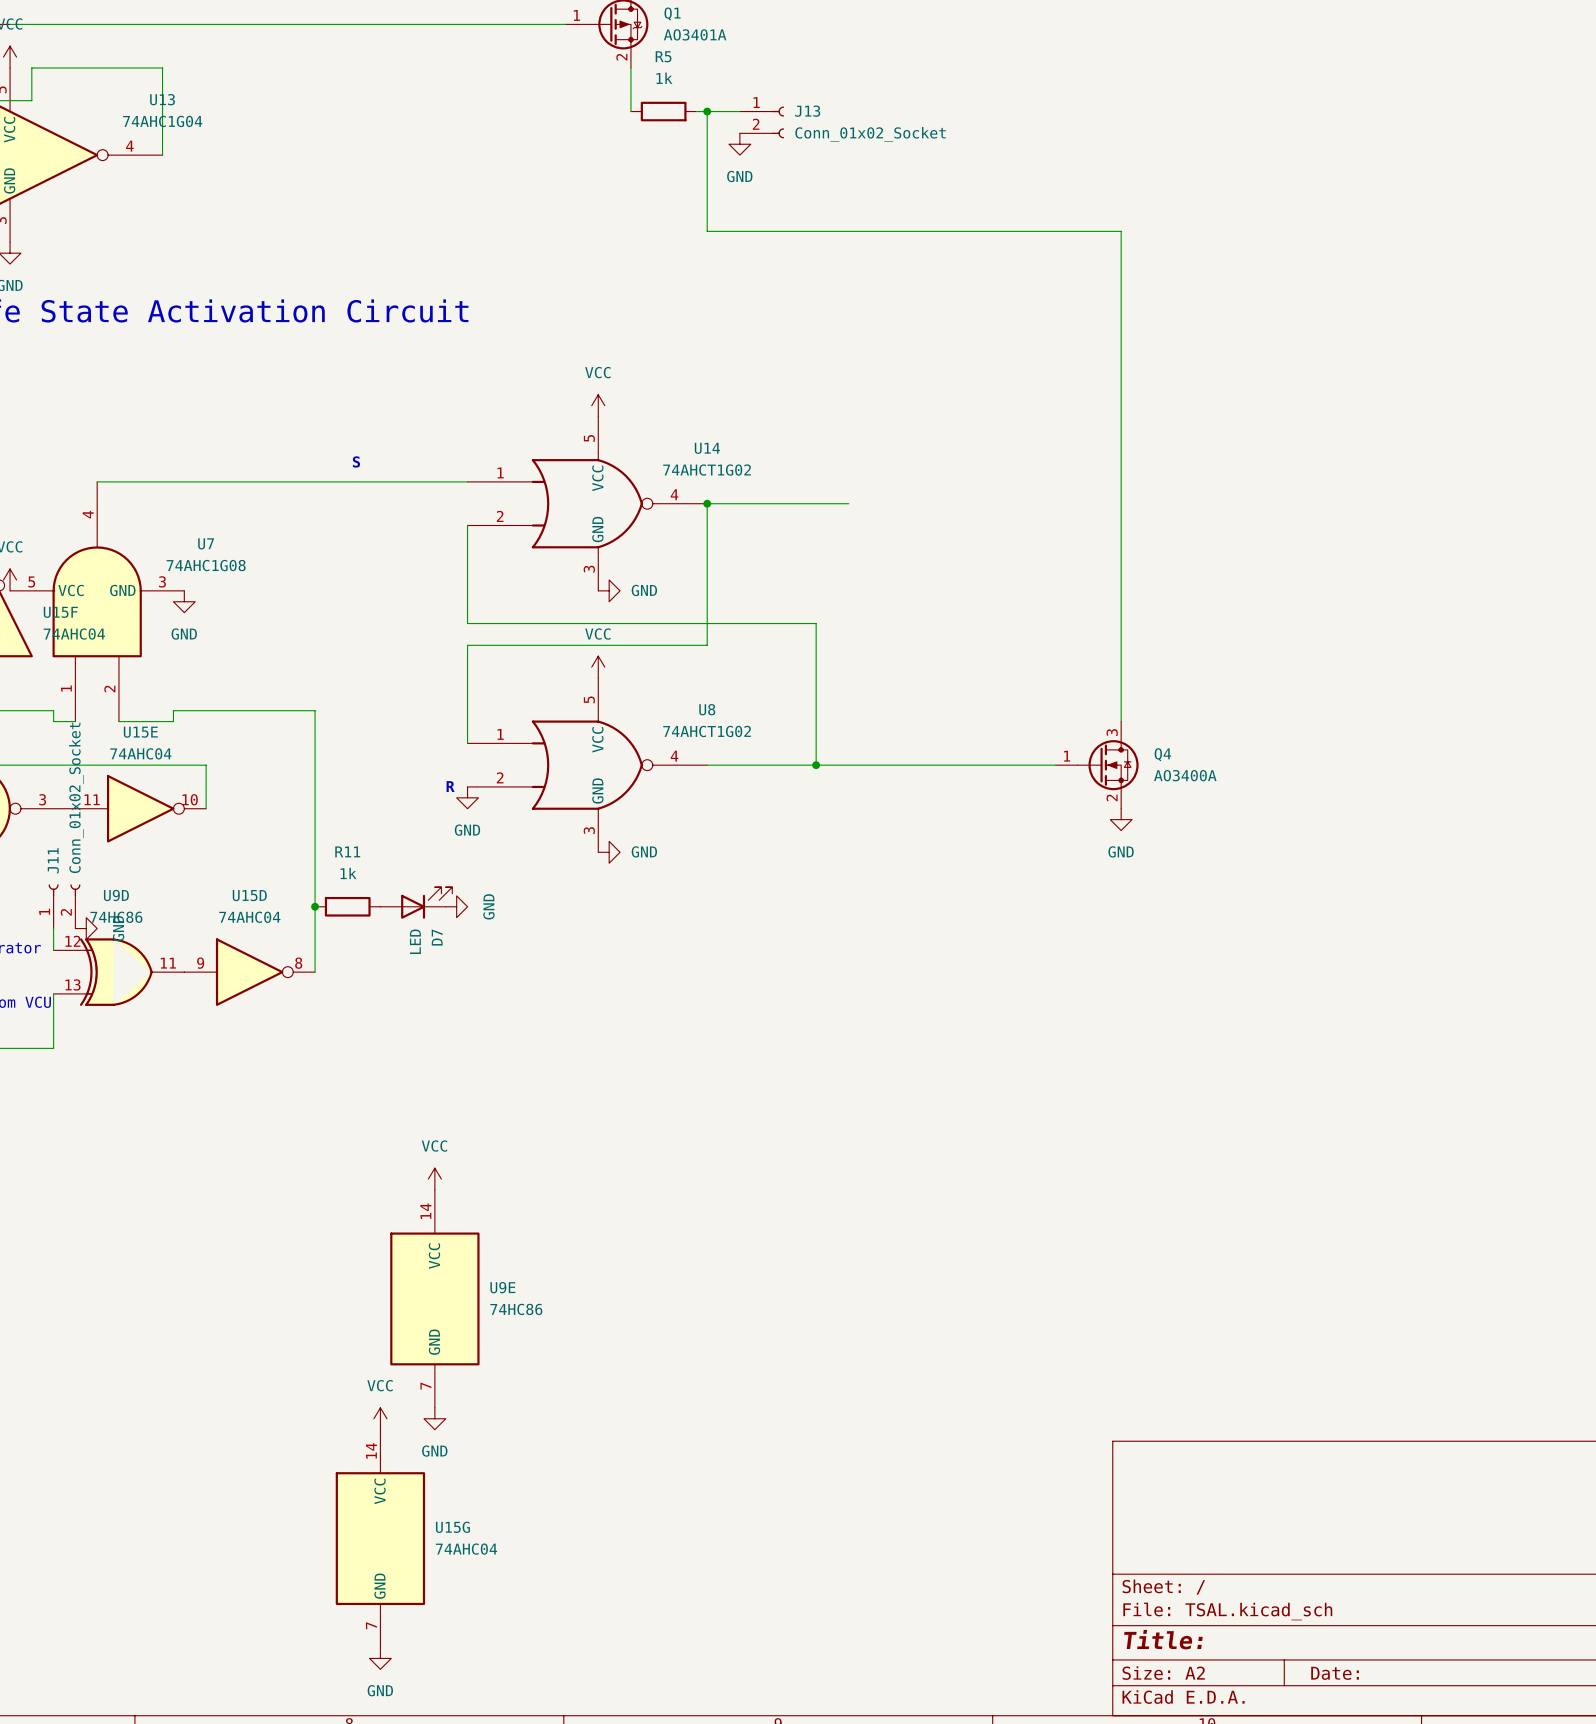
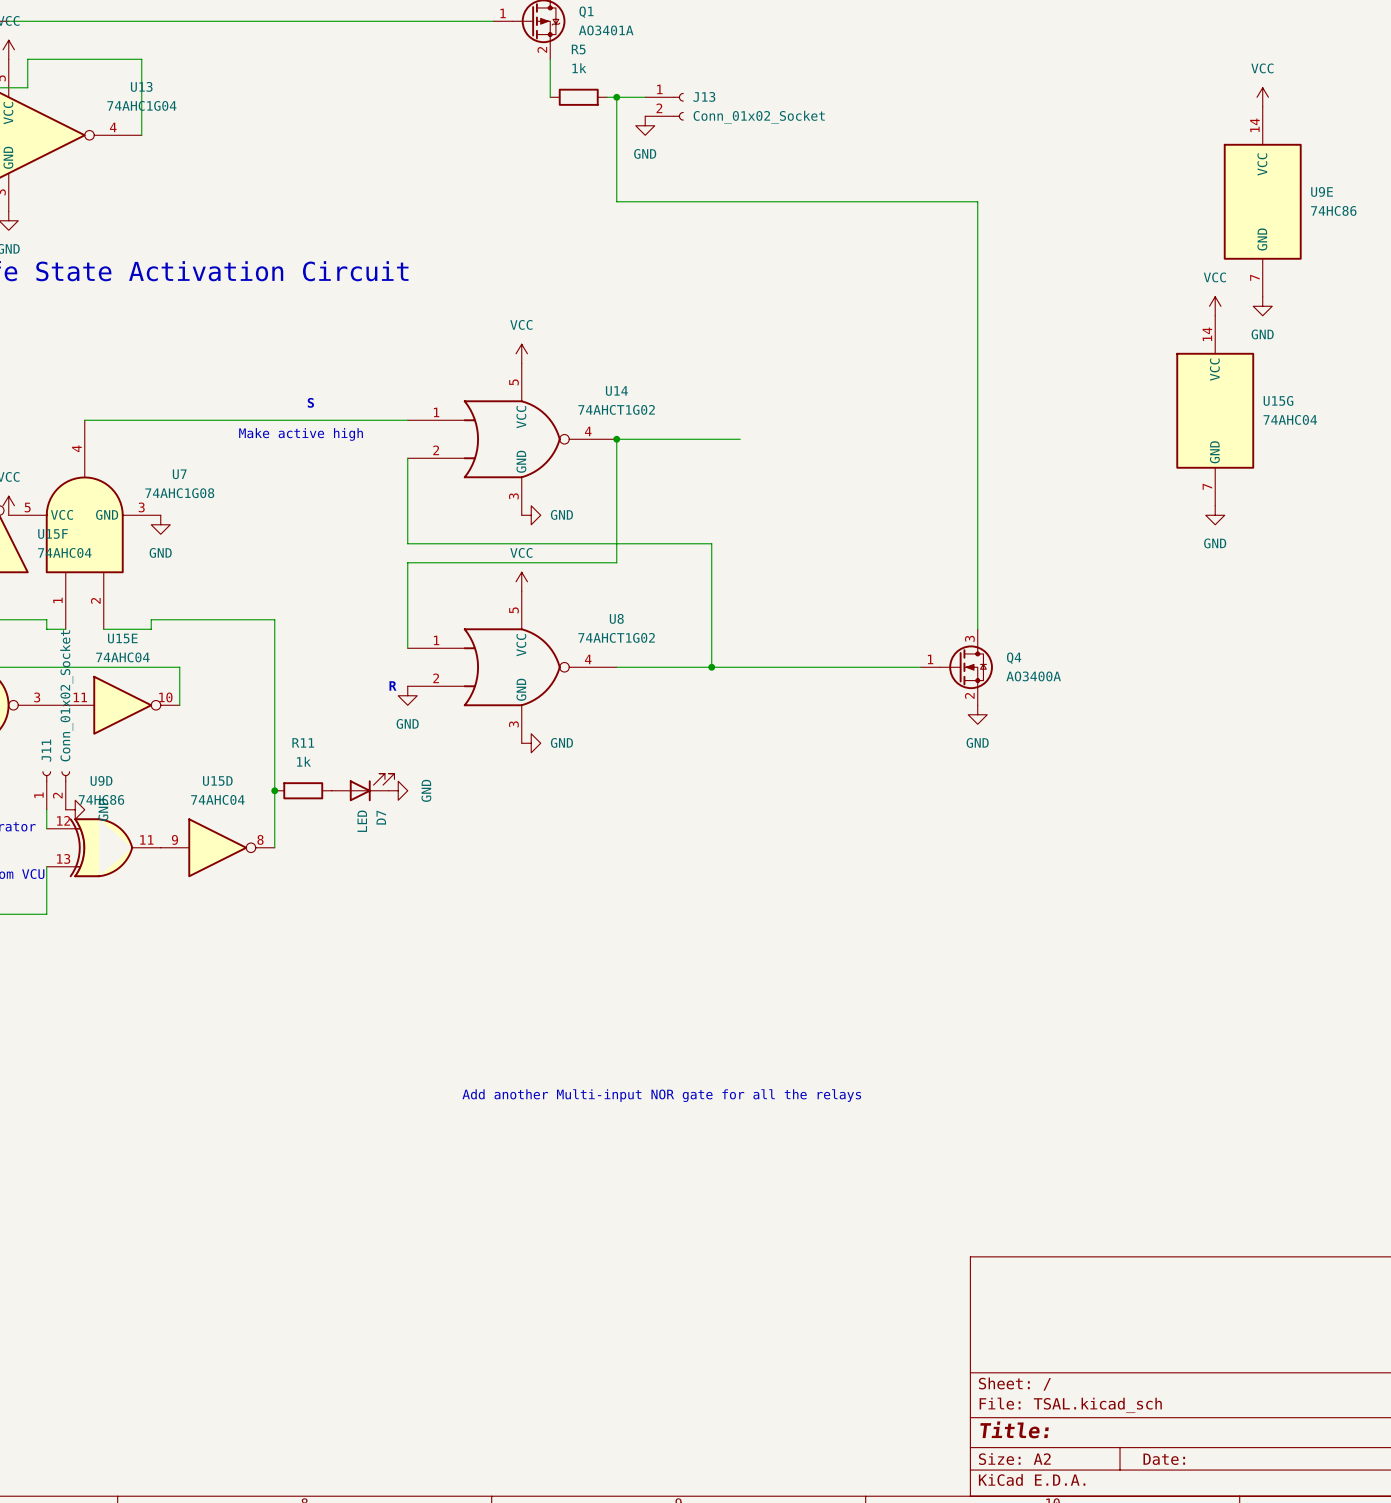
power symbol: none -> VCC (1262, 97)
power symbol: none -> VCC (1215, 306)
power symbol: none -> GND (1262, 306)
text: none -> Make active high (301, 434)
power symbol: none -> GND (1215, 515)
power symbol: VCC (434, 1179) -> none
text: none -> Add another Multi-input NOR gate for all the relays (661, 1095)
U9E position: (434, 1298) -> (1262, 201)
power symbol: VCC (380, 1418) -> none
power symbol: GND (434, 1418) -> none
U15G position: (380, 1538) -> (1215, 410)
power symbol: GND (380, 1658) -> none

